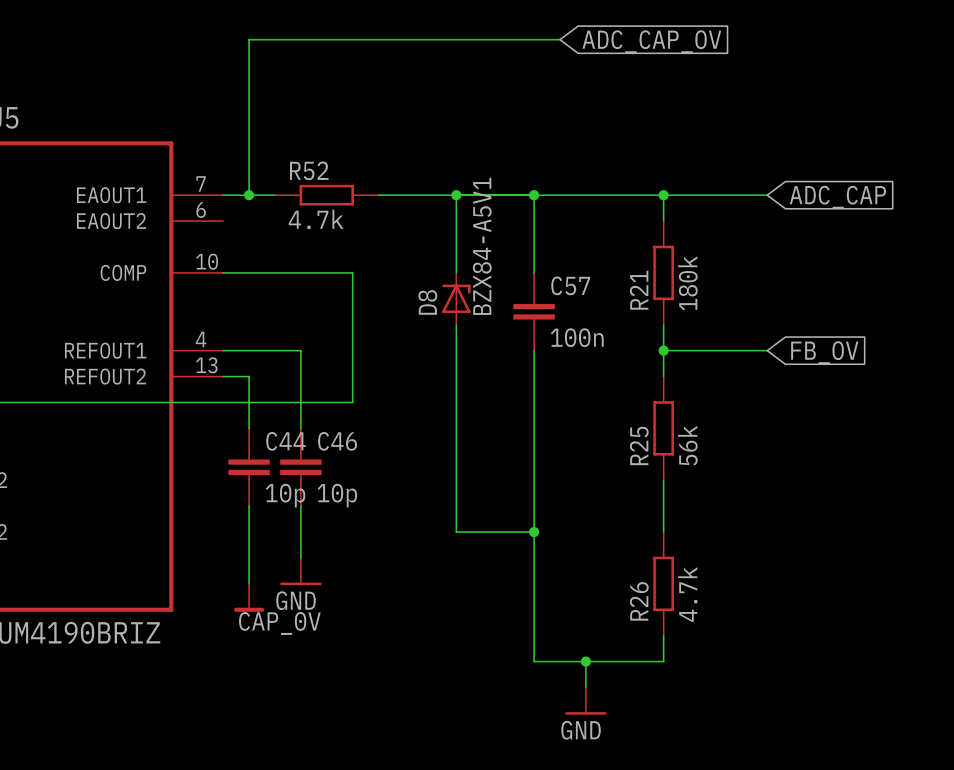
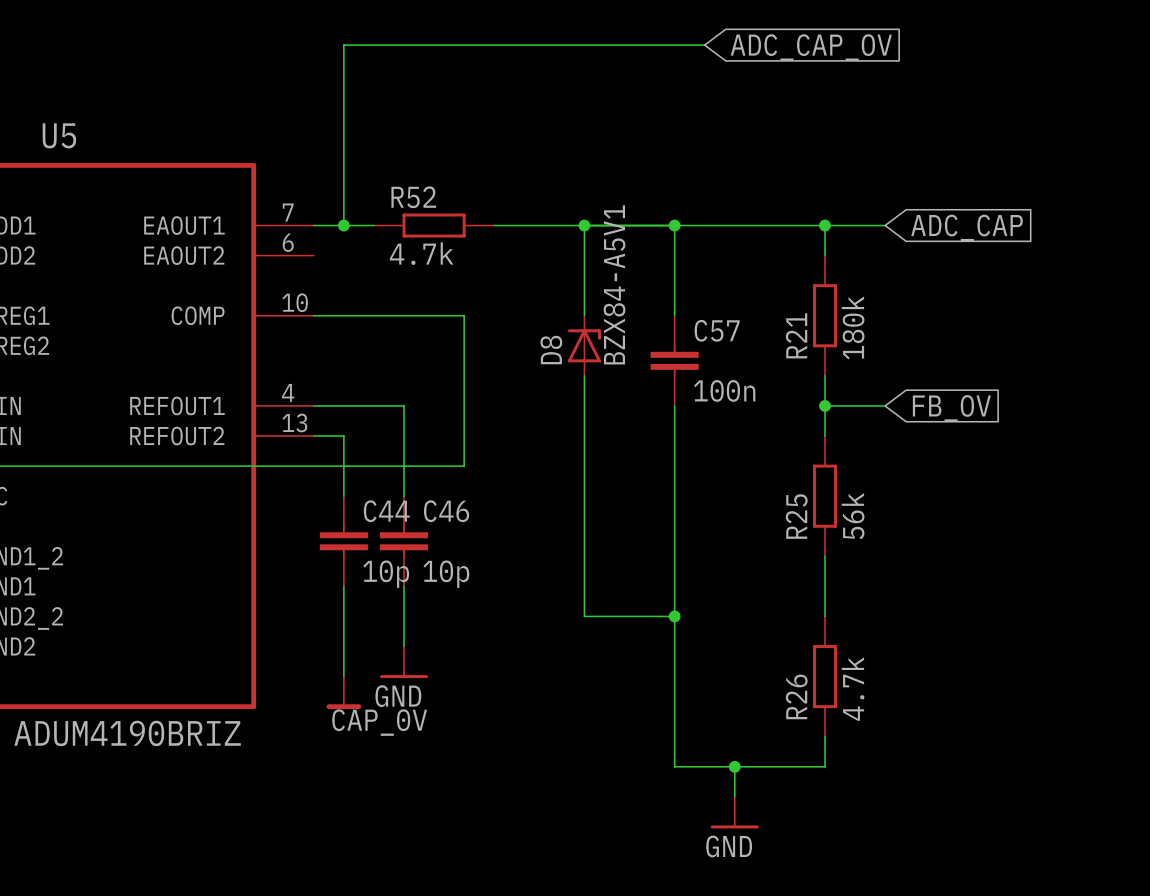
wire: (715, 195) (767, 195) -> none
global label position: ADC_CAP (837, 197) -> ADC_CAP (967, 227)
wire: (715, 350) (767, 350) -> none
global label position: FB_OV (824, 352) -> FB_OV (951, 408)

